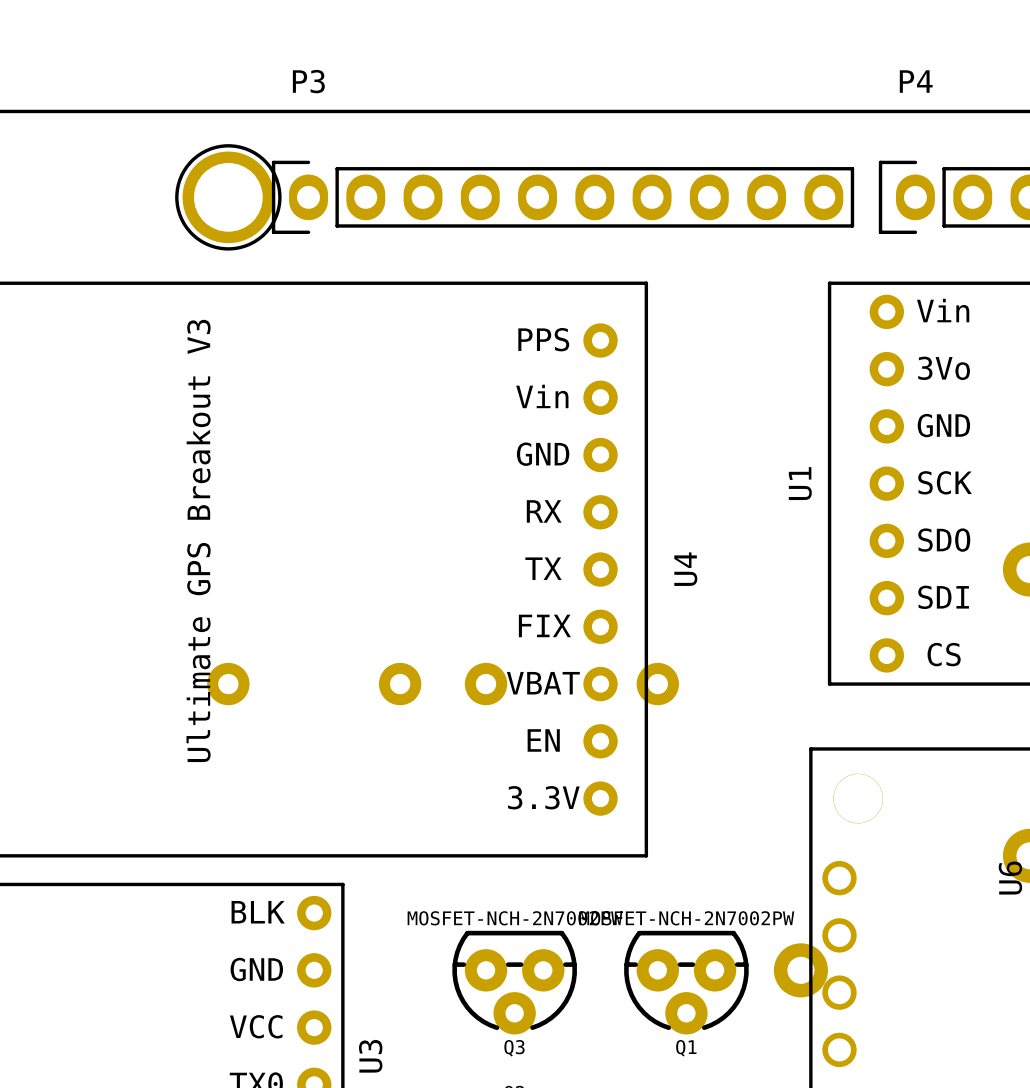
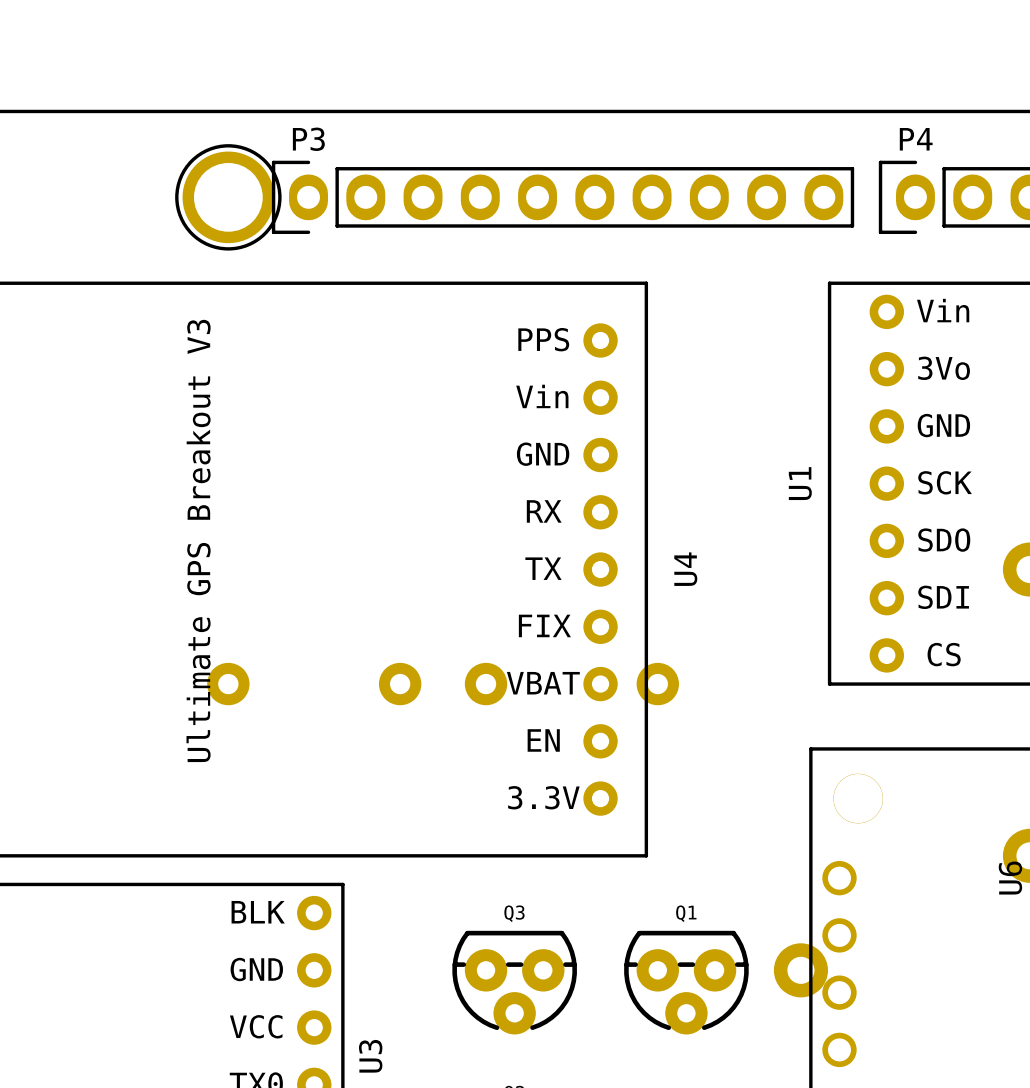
P3 name position: P3 (308, 81) -> P3 (308, 139)
P4 name position: P4 (916, 81) -> P4 (916, 139)
Q3 value: MOSFET-NCH-2N7002PW (515, 918) -> none
Q1 value: MOSFET-NCH-2N7002PW (686, 918) -> none
Q3 name position: Q3 (514, 1048) -> Q3 (514, 913)
Q1 name position: Q1 (686, 1048) -> Q1 (686, 913)

